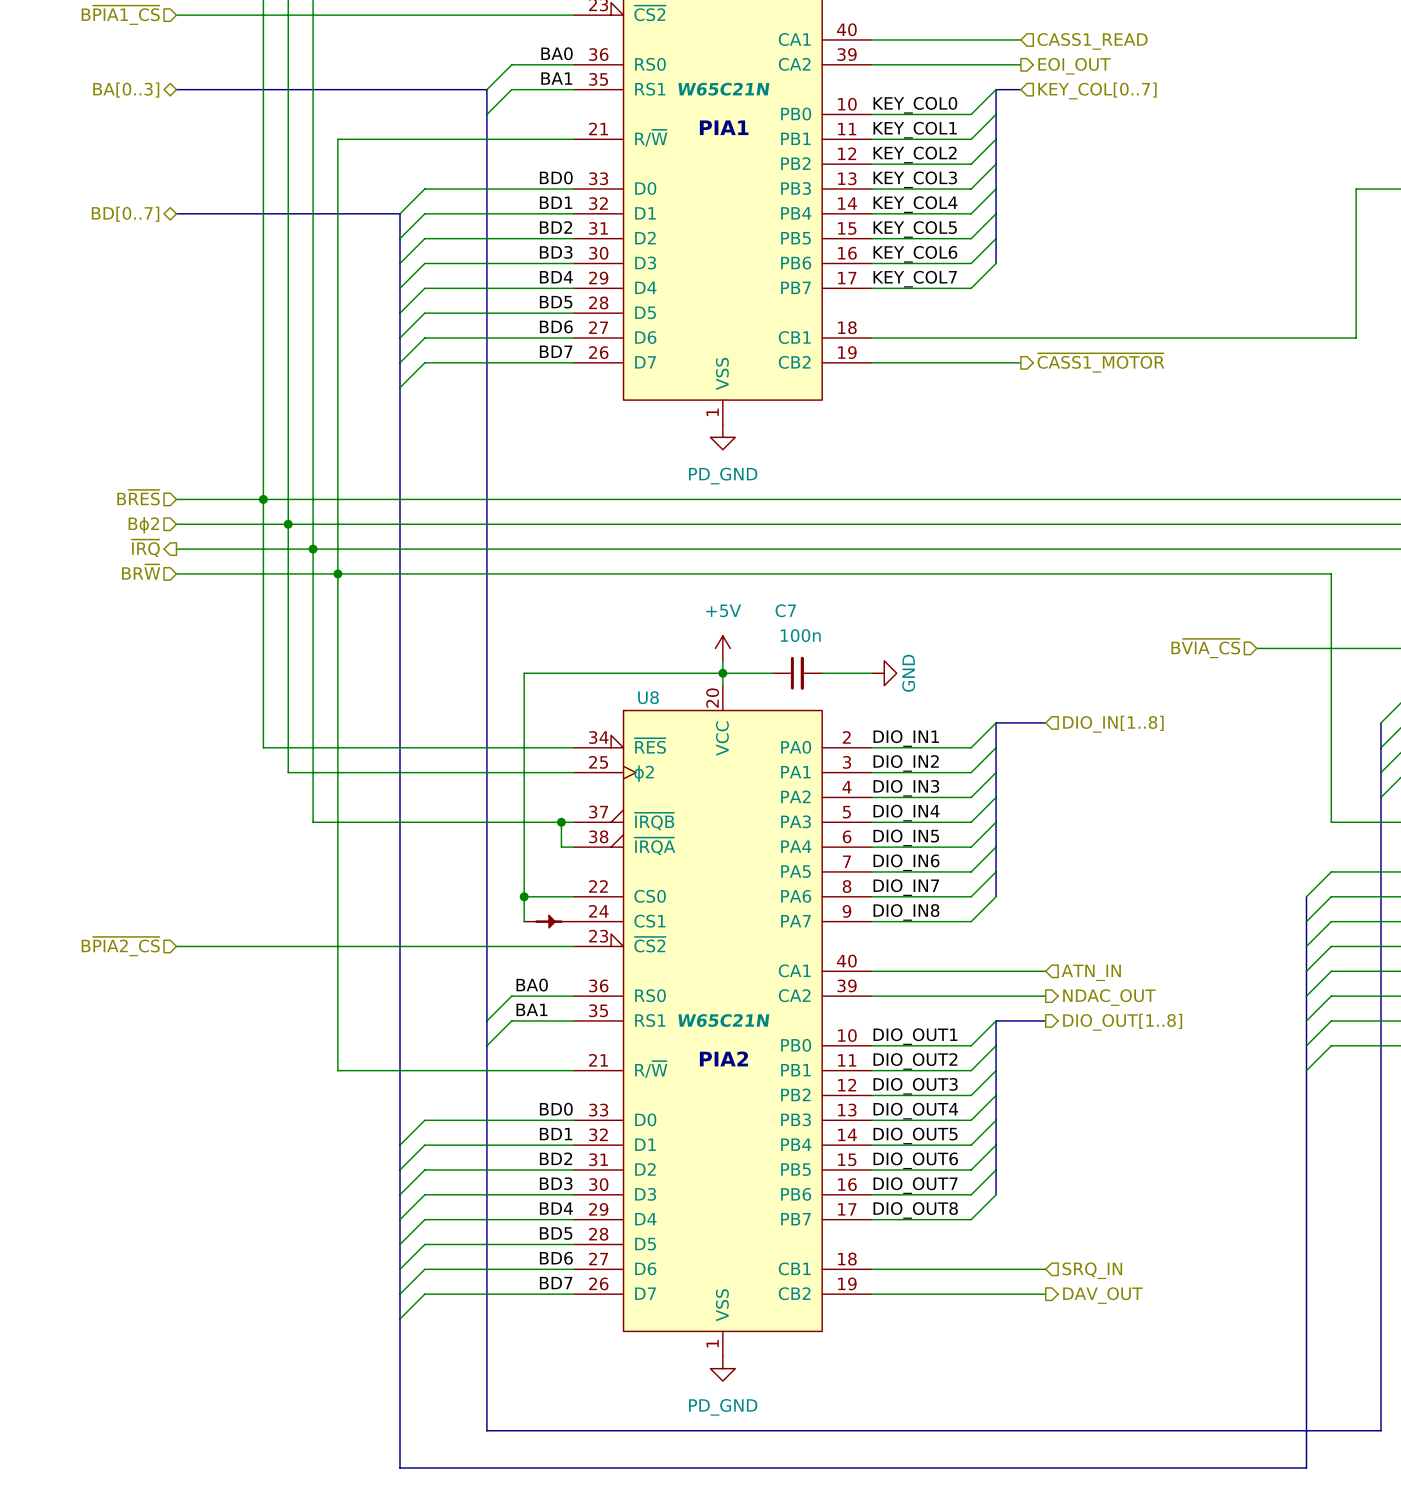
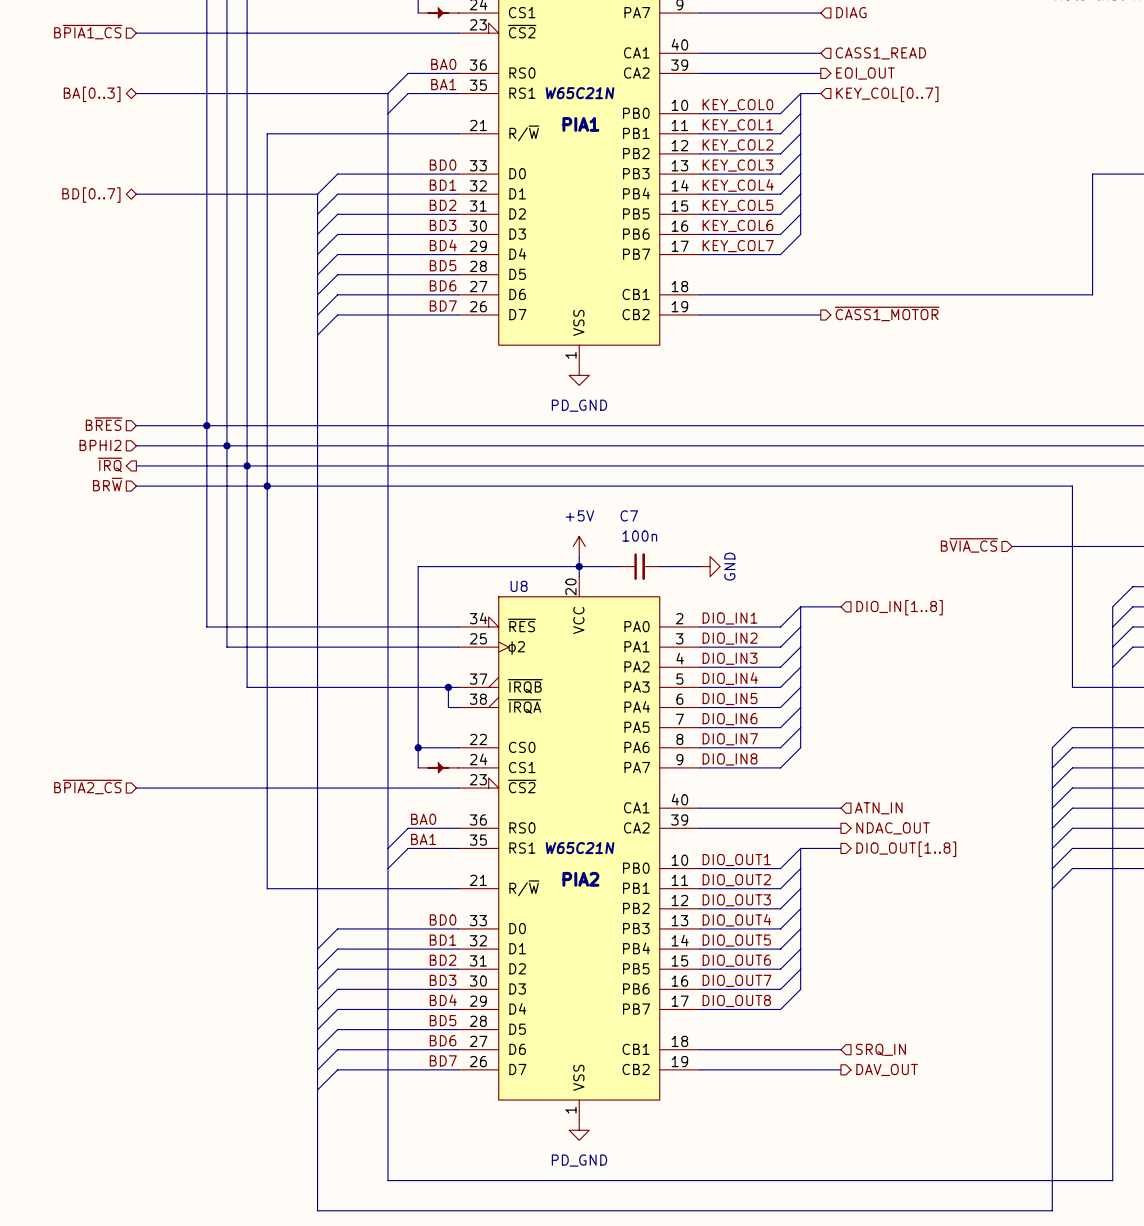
hierarchical label: Bϕ2 (143, 525) -> BPHI2 (100, 445)

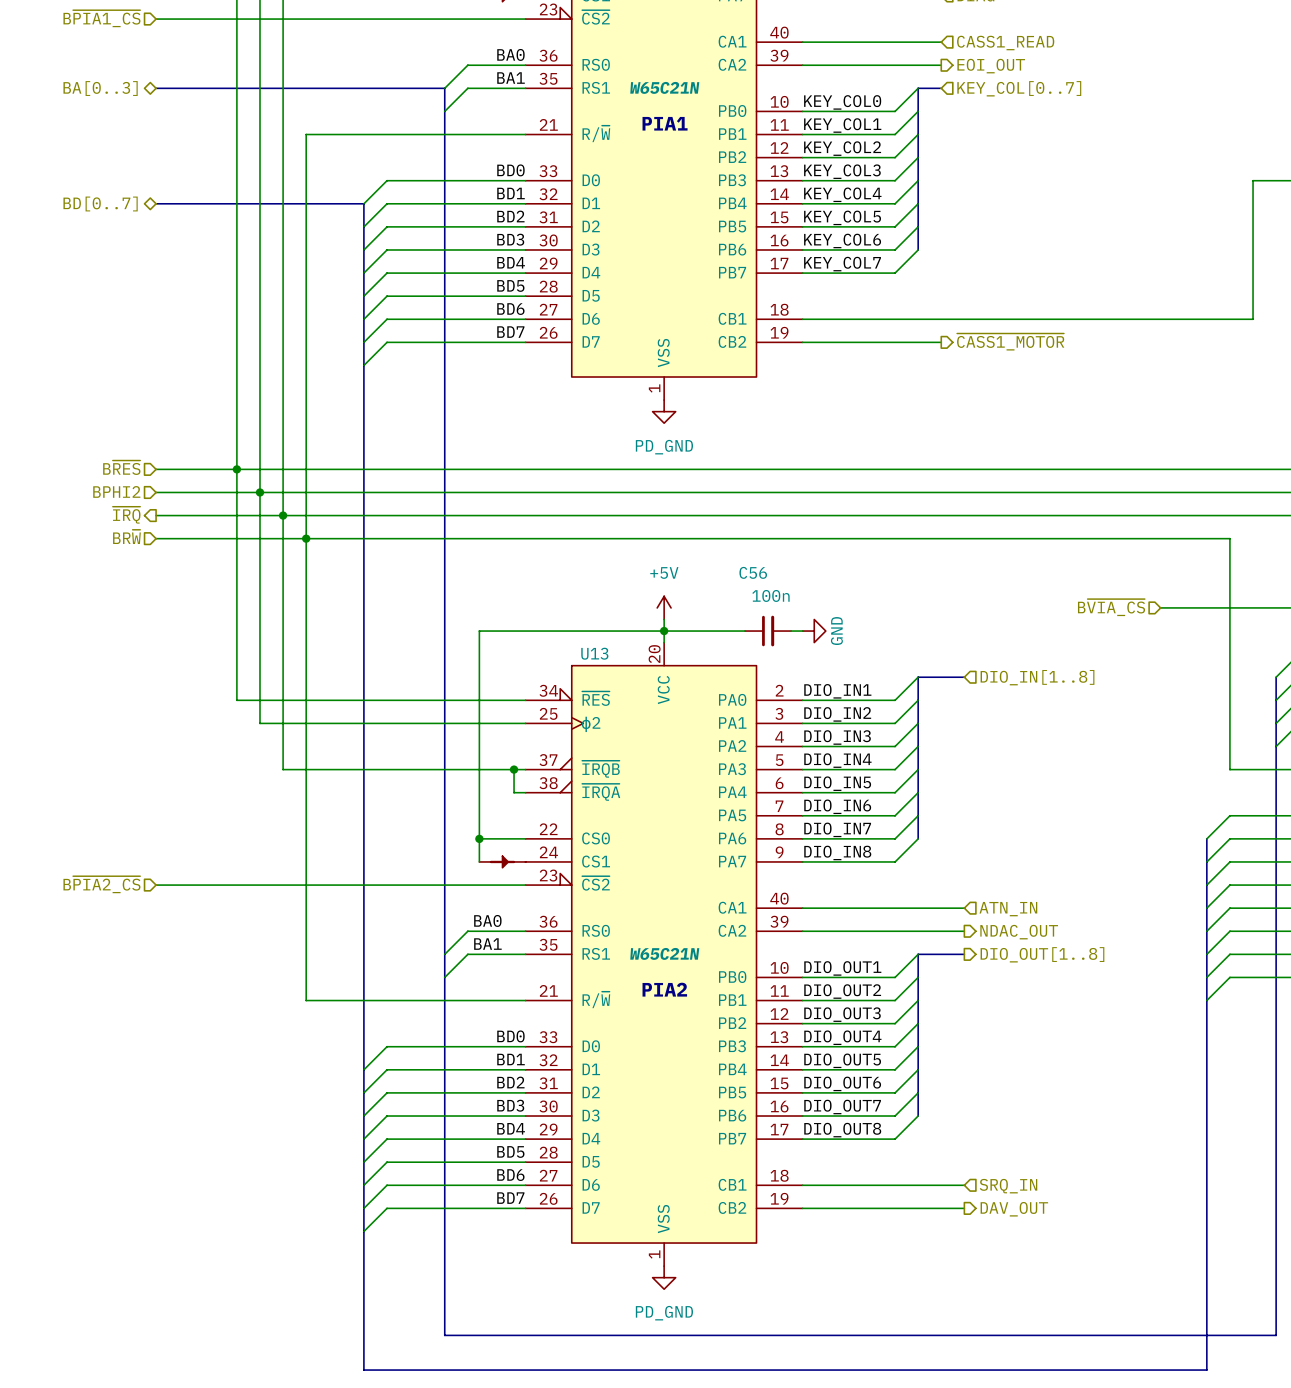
C7: 100n (639, 566) -> none
C56: none -> 100n (768, 631)
U8 name: U8 (519, 586) -> U13 (594, 653)

